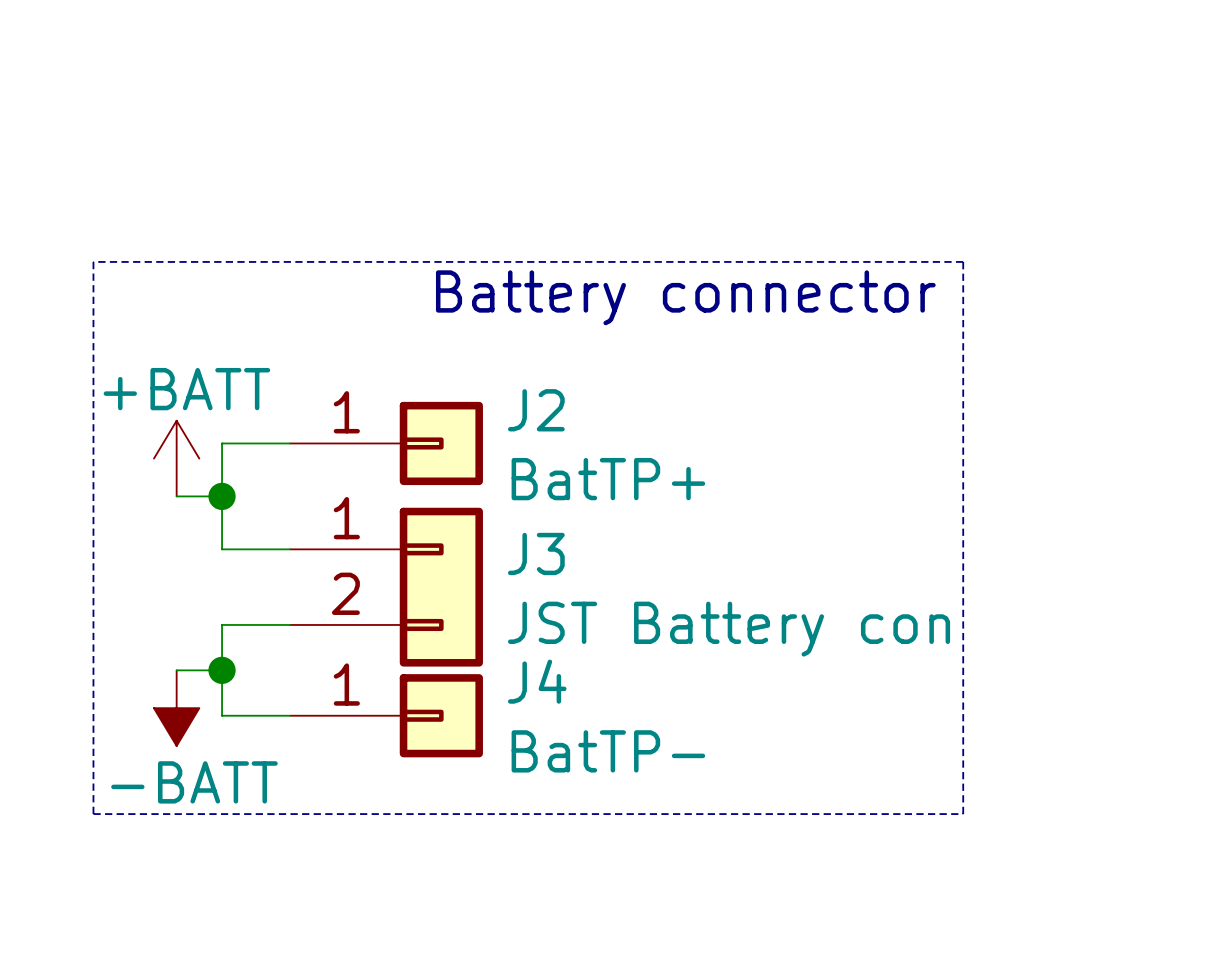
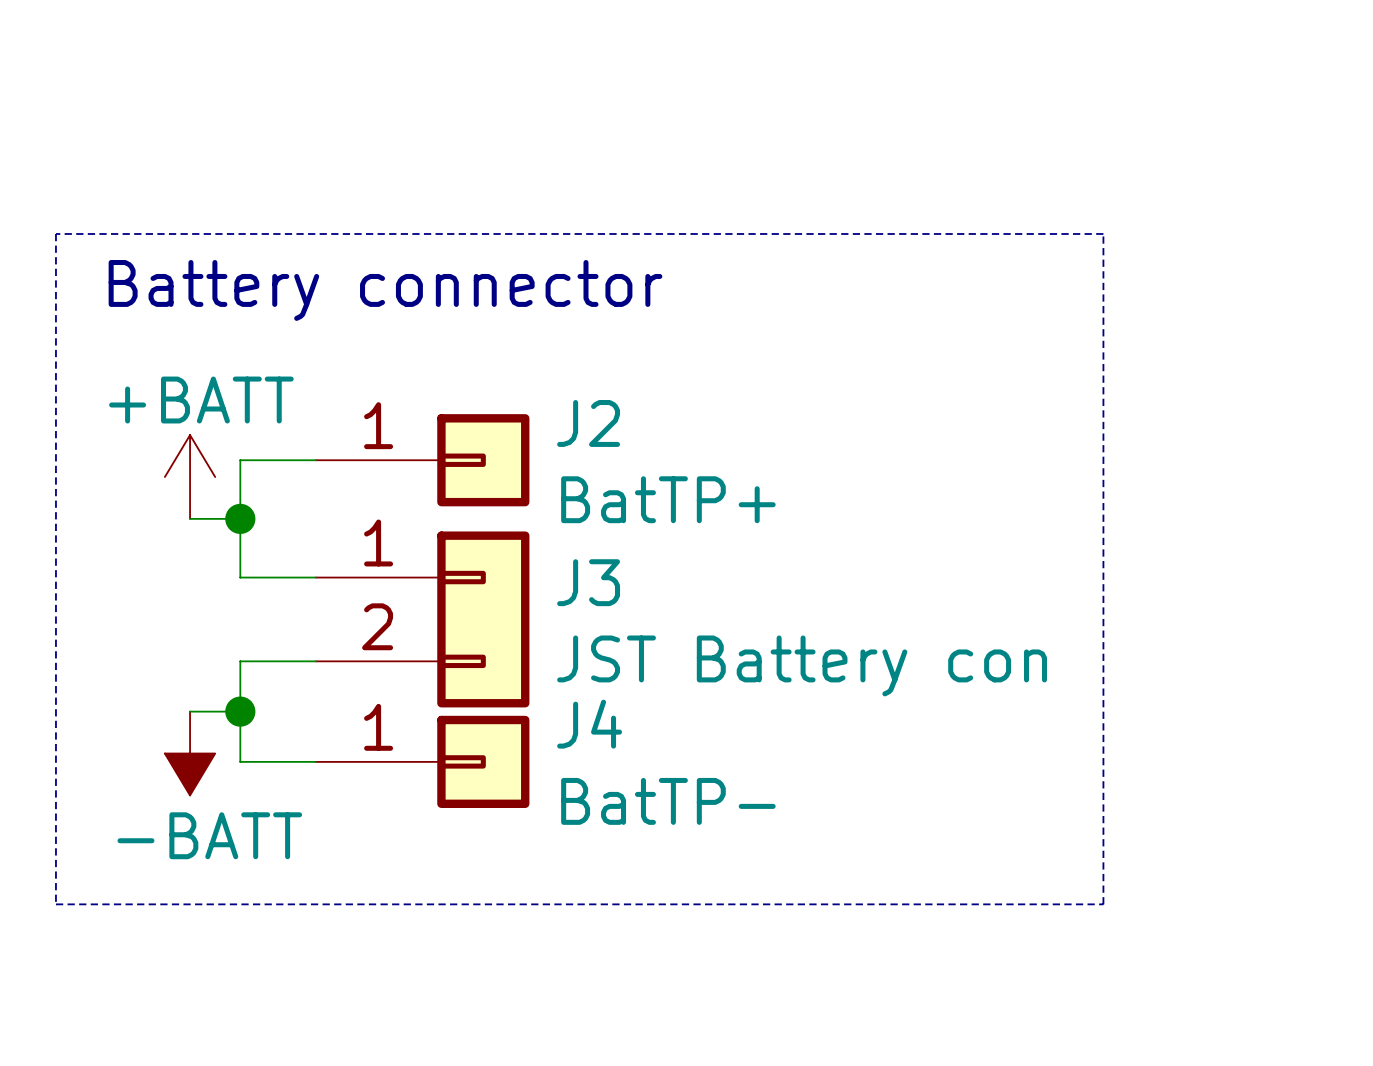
line: (93, 261) (963, 261) (963, 814) (93, 814) (93, 261) -> (55, 233) (55, 904) (1103, 904) (1103, 233) (55, 233)
text position: Battery connector (685, 297) -> Battery connector (385, 290)

